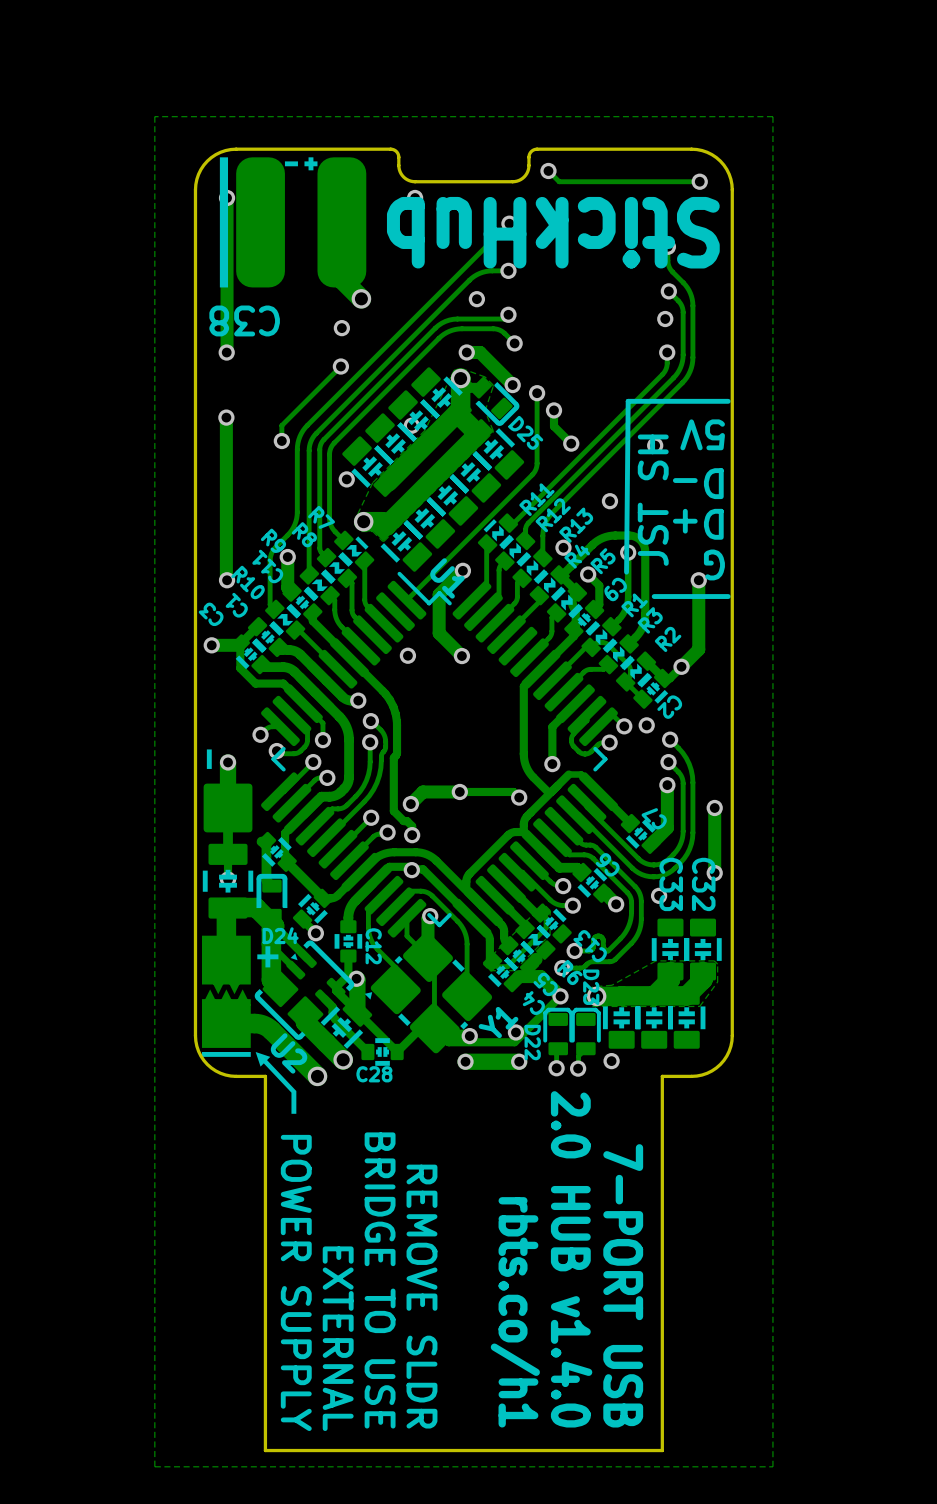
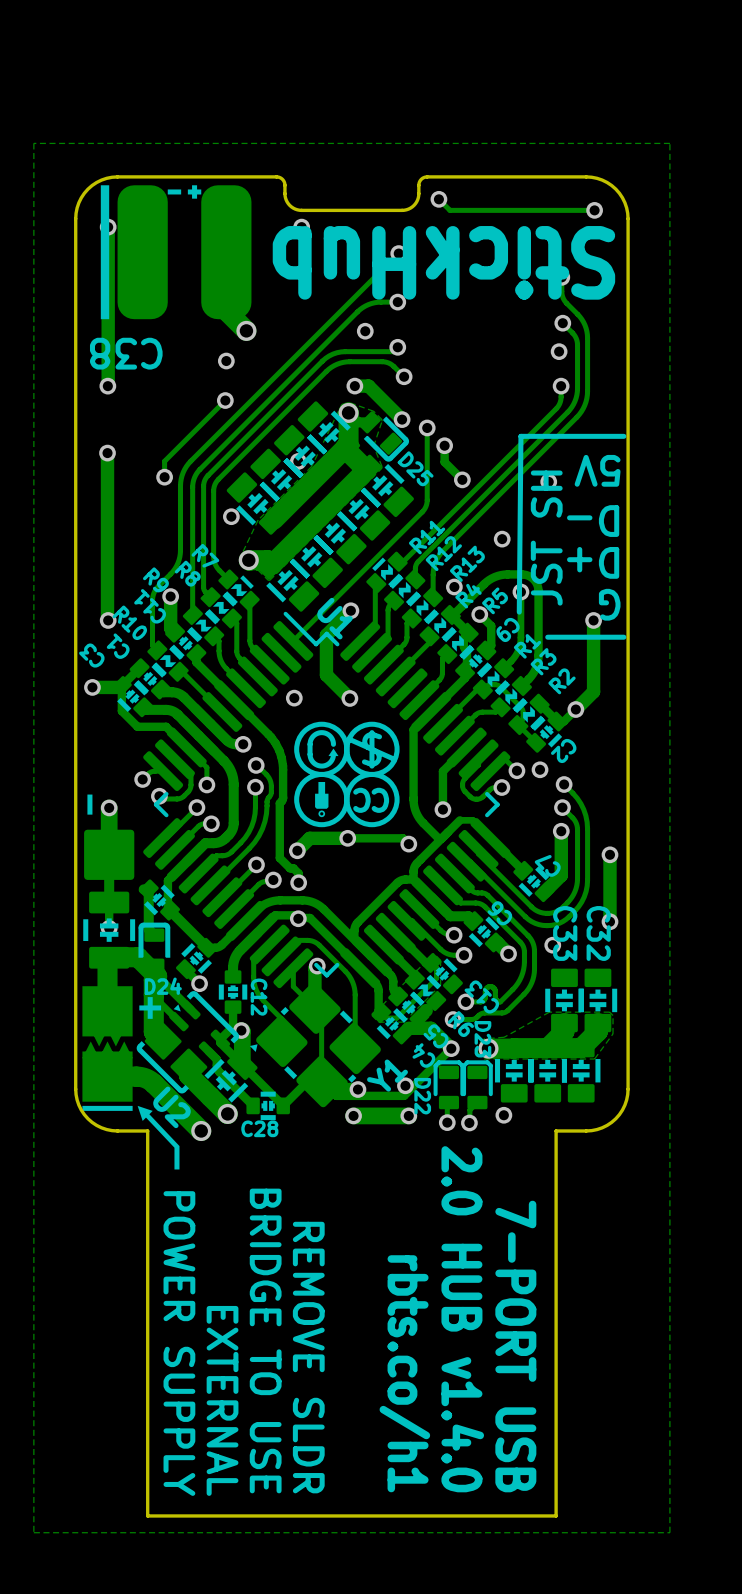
drawing: none -> [294, 721, 400, 828]

